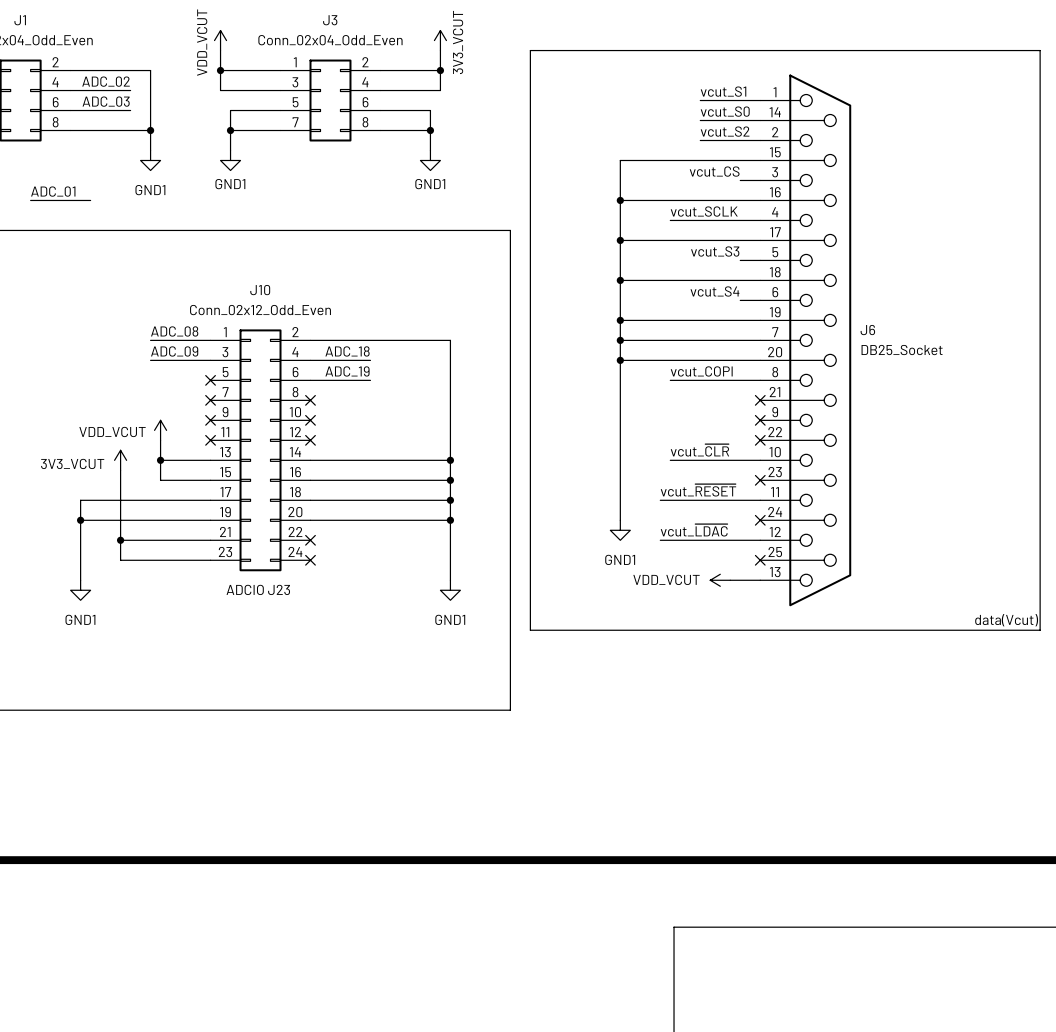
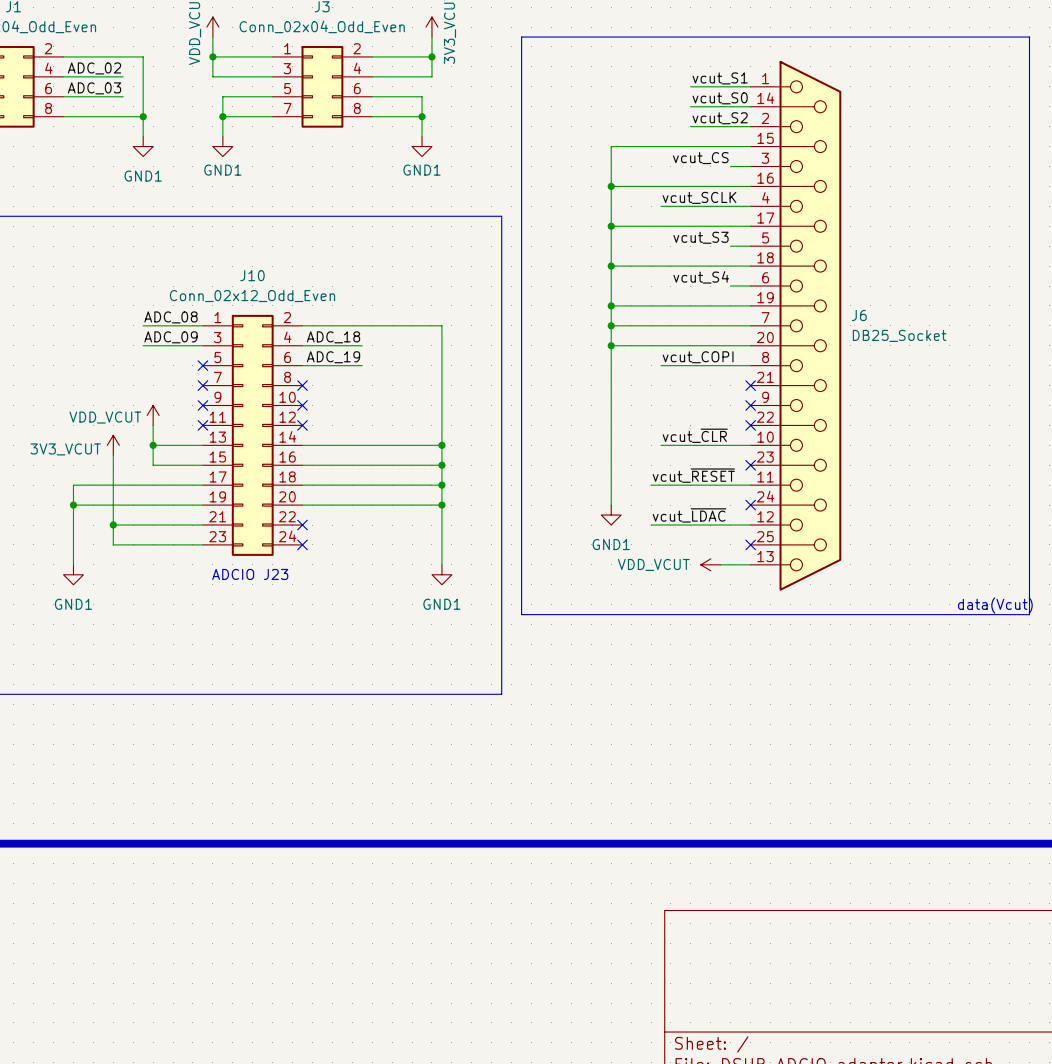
label: ADC_01 (53, 191) -> none
wire: (30, 200) (90, 200) -> none

